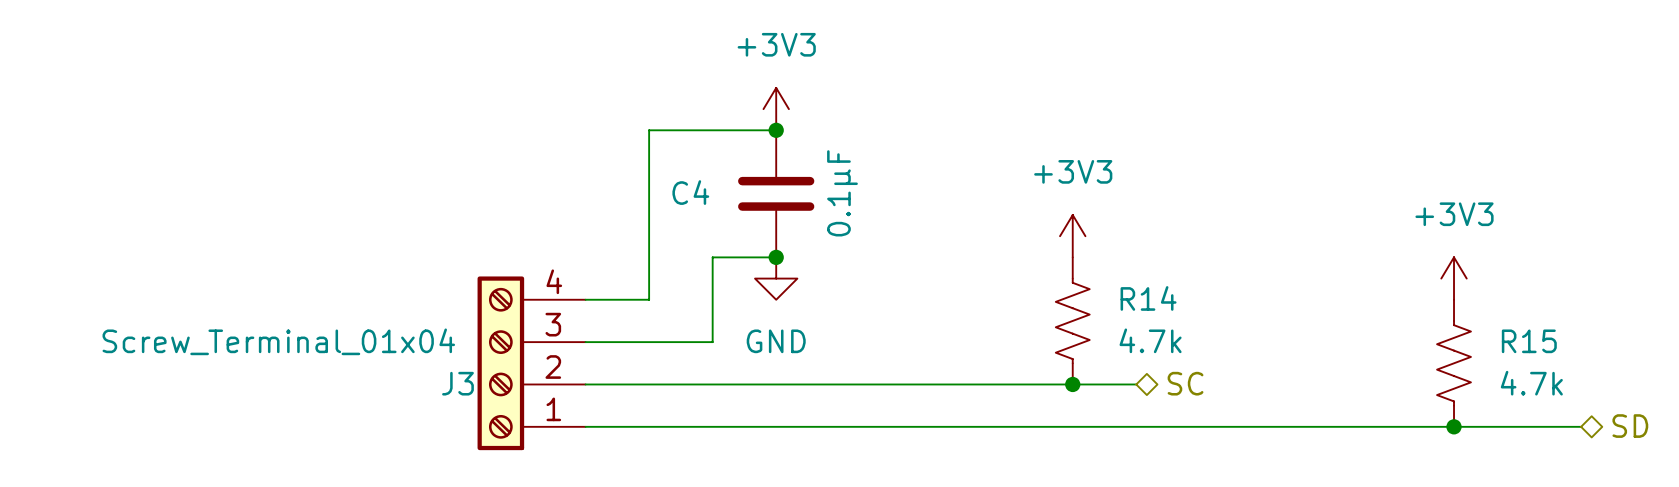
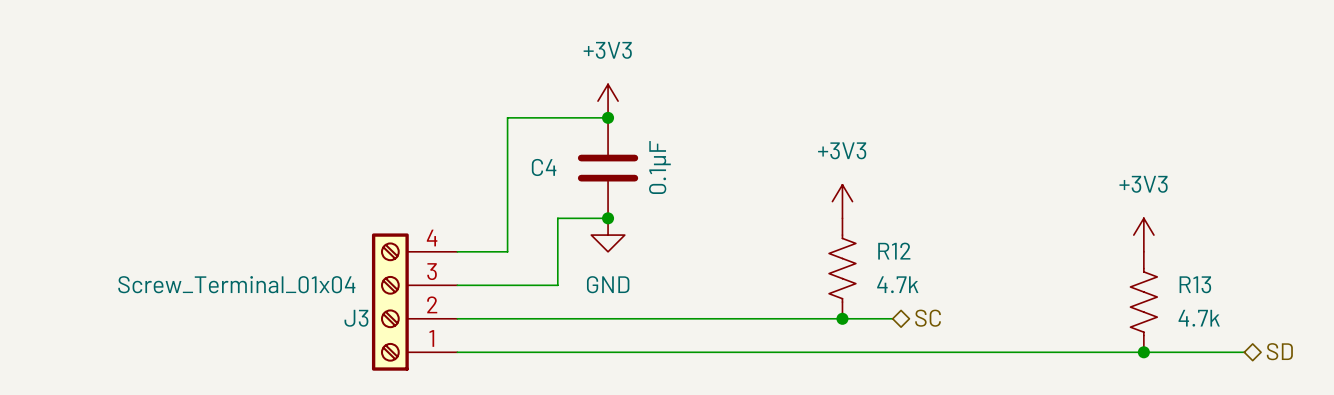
R14 name: R14 (1148, 298) -> R12 (894, 251)
R15 name: R15 (1529, 341) -> R13 (1195, 284)

